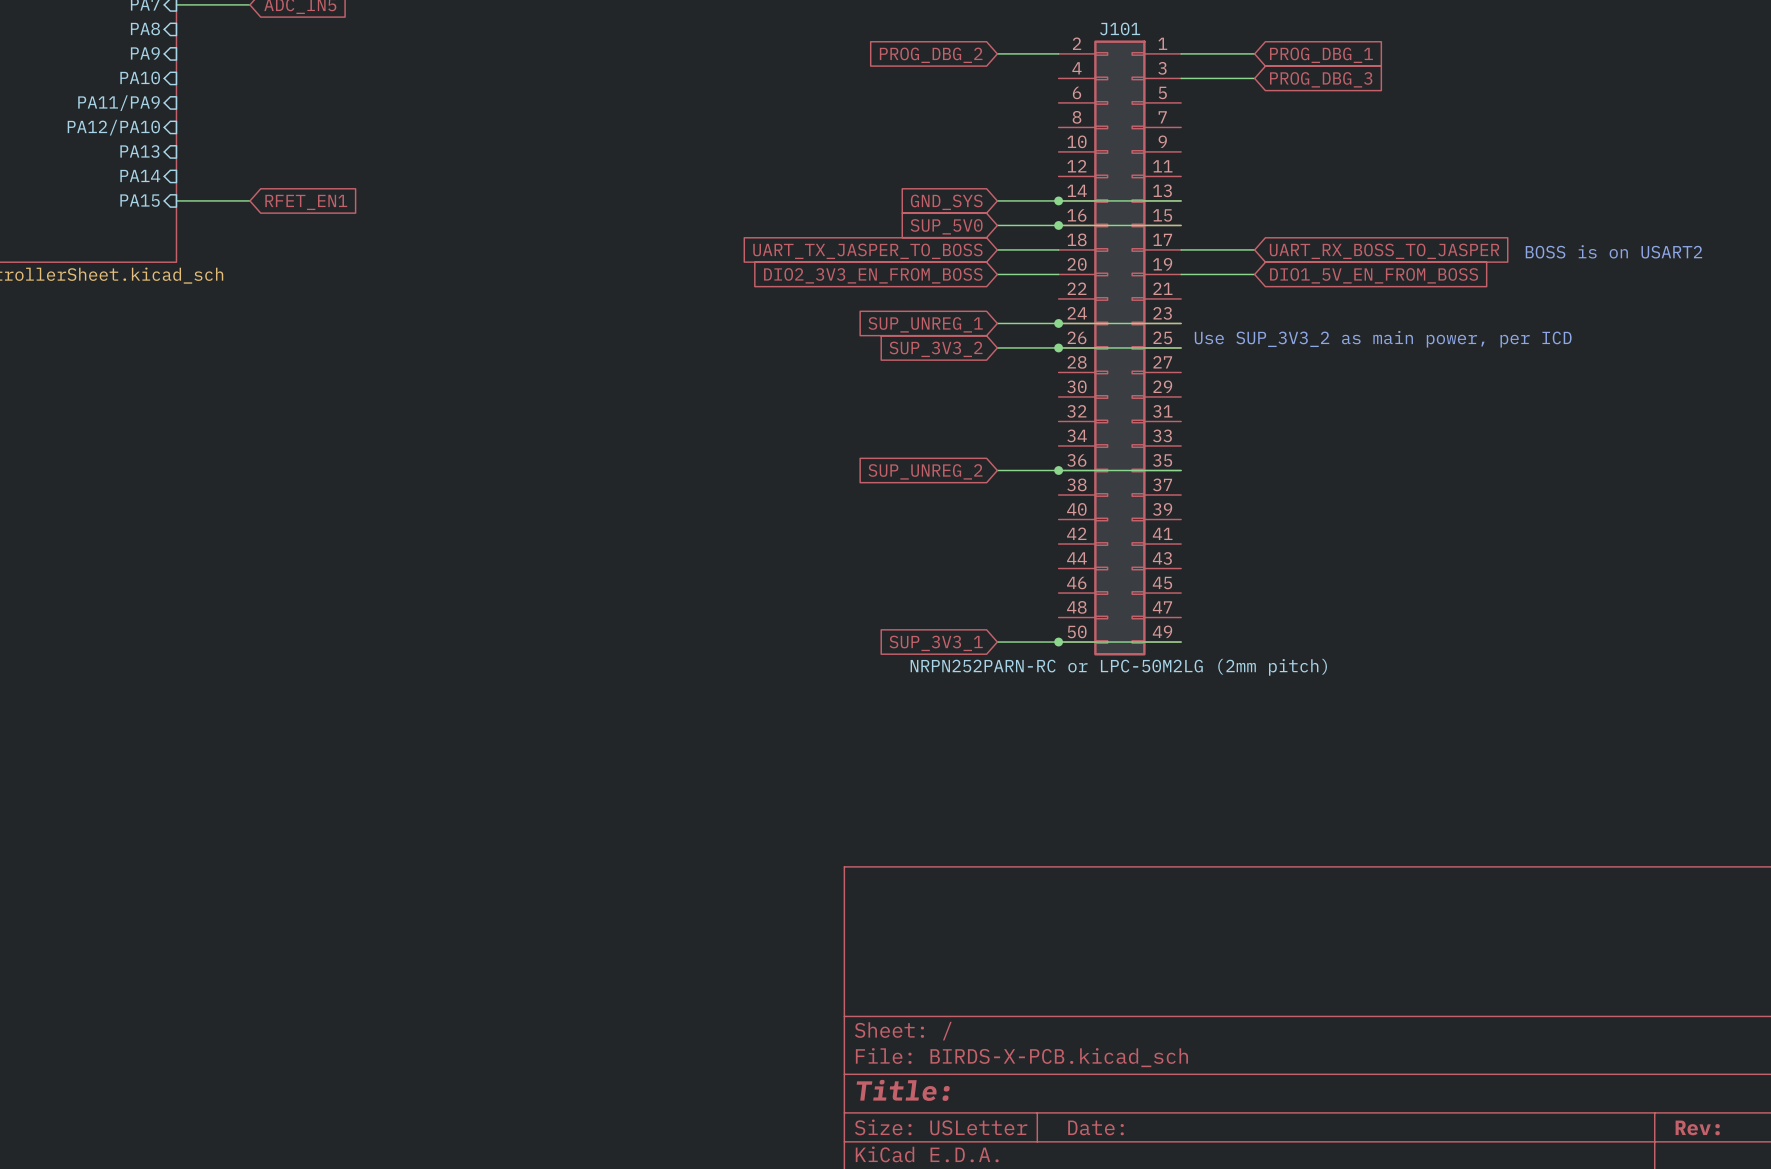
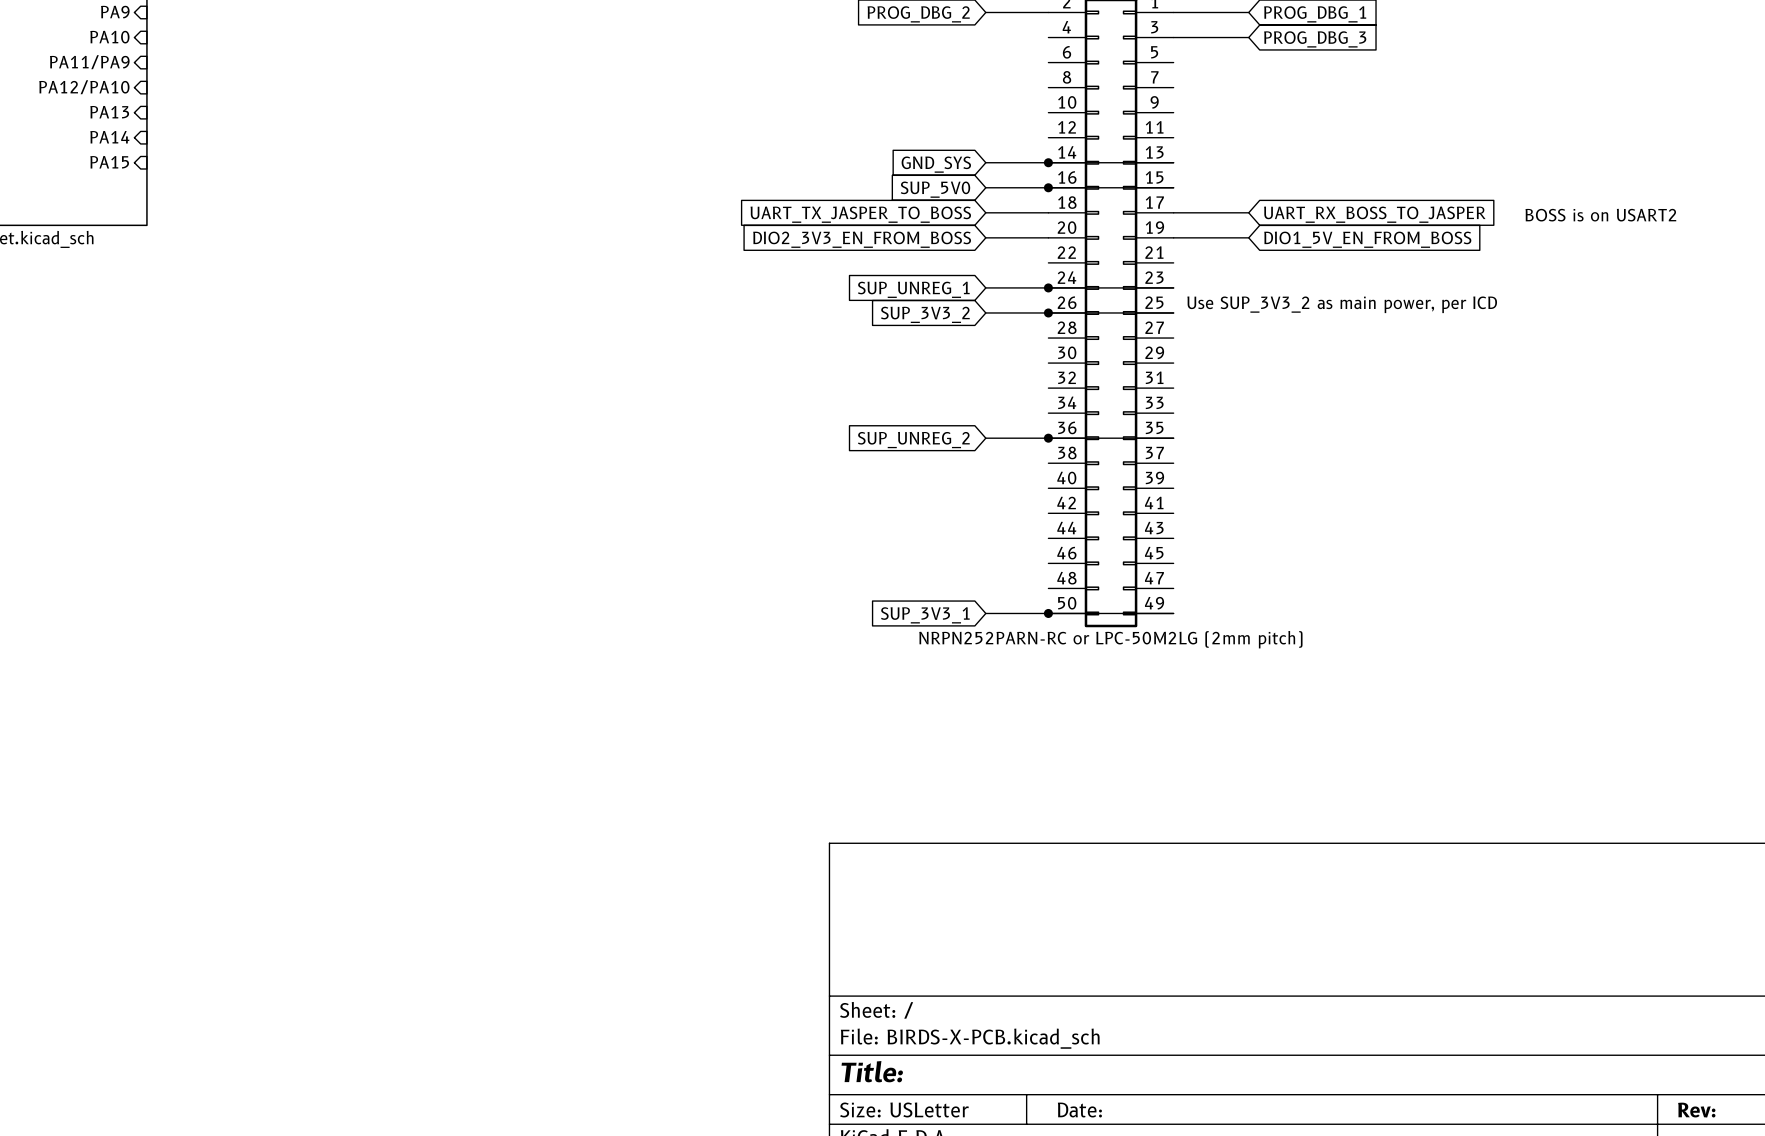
wire: (176, 200) (249, 200) -> none
global label: RFET_EN1 (306, 202) -> none

